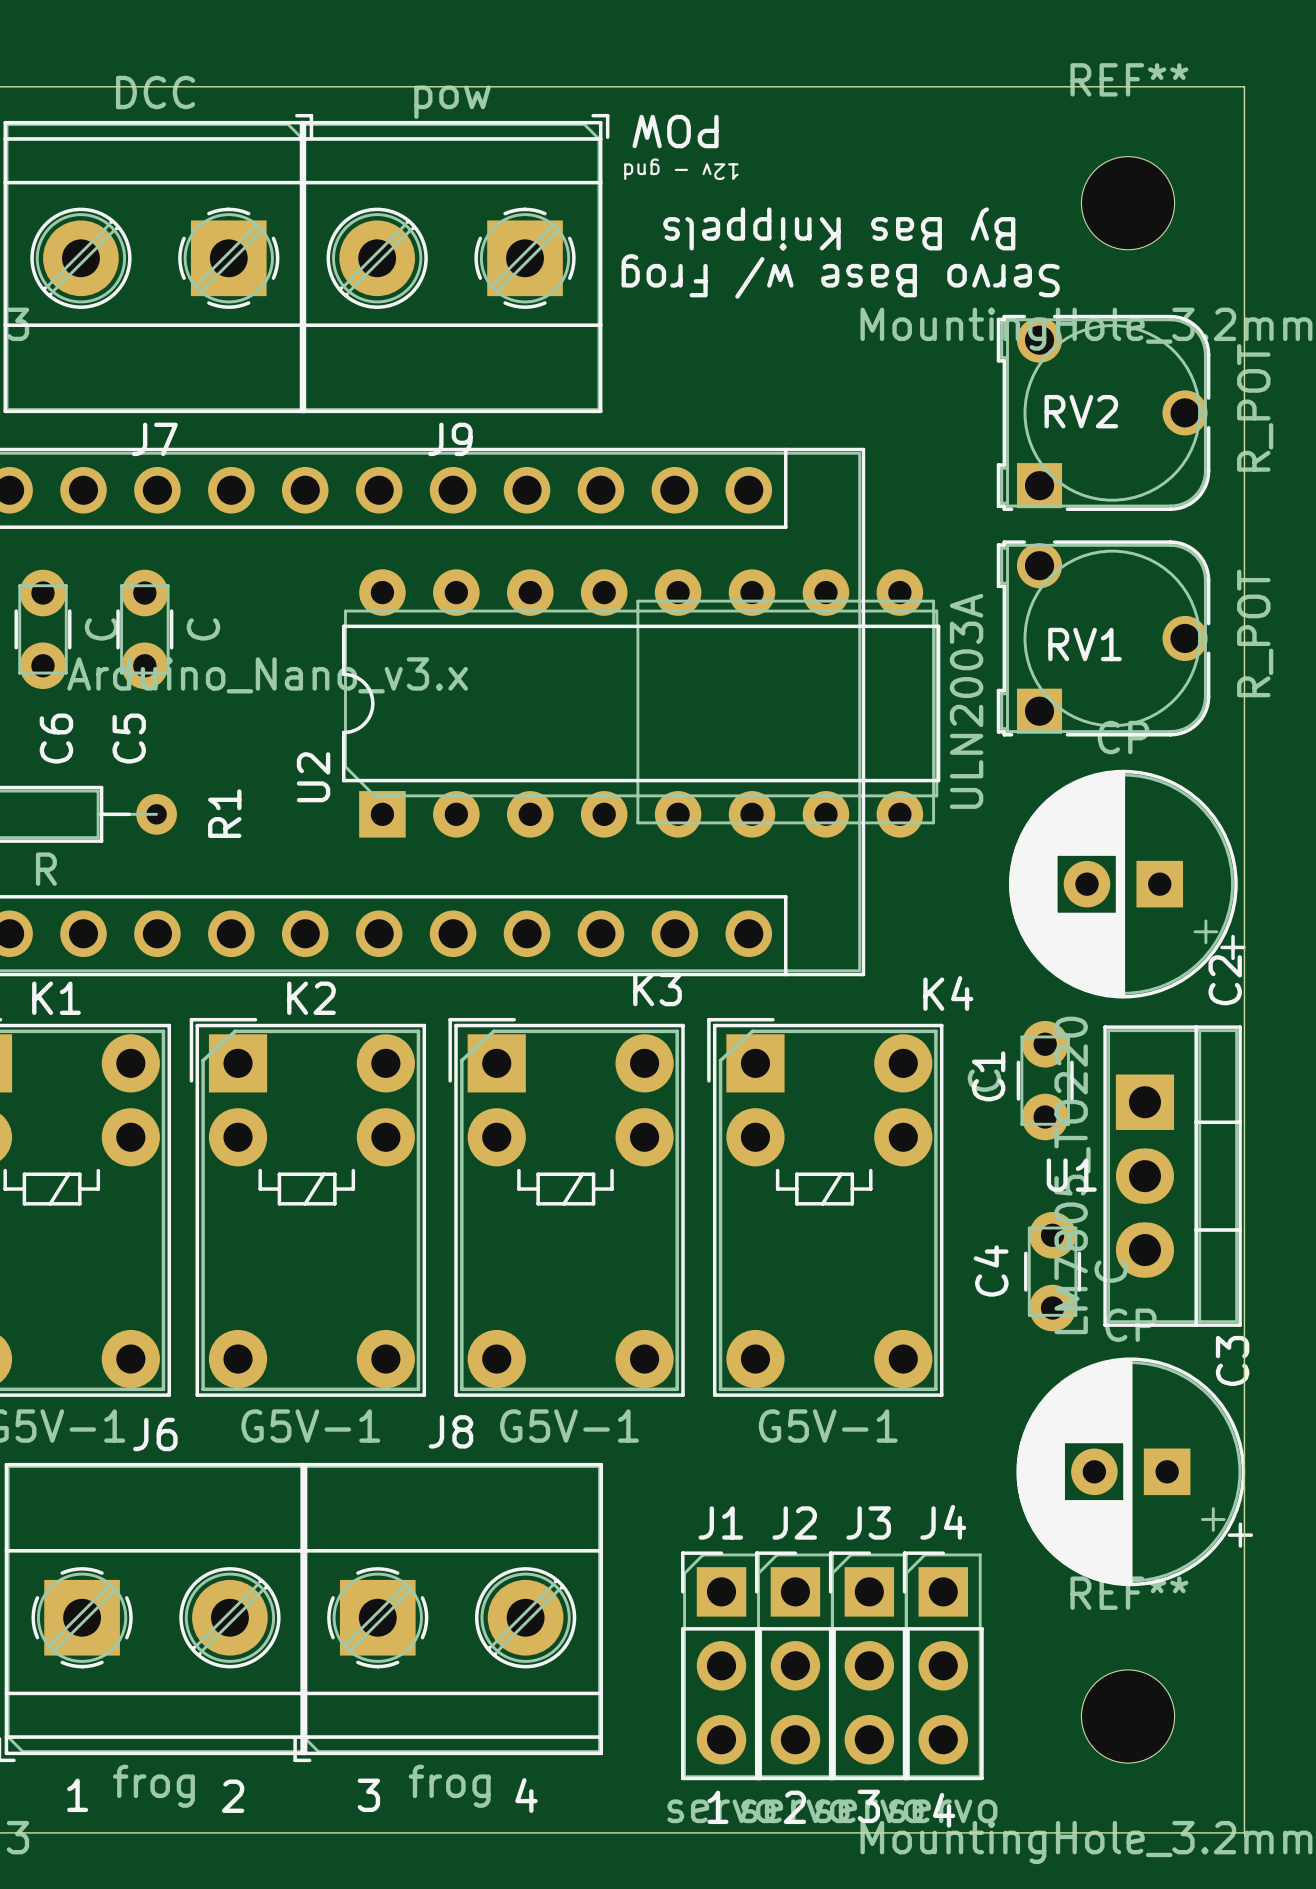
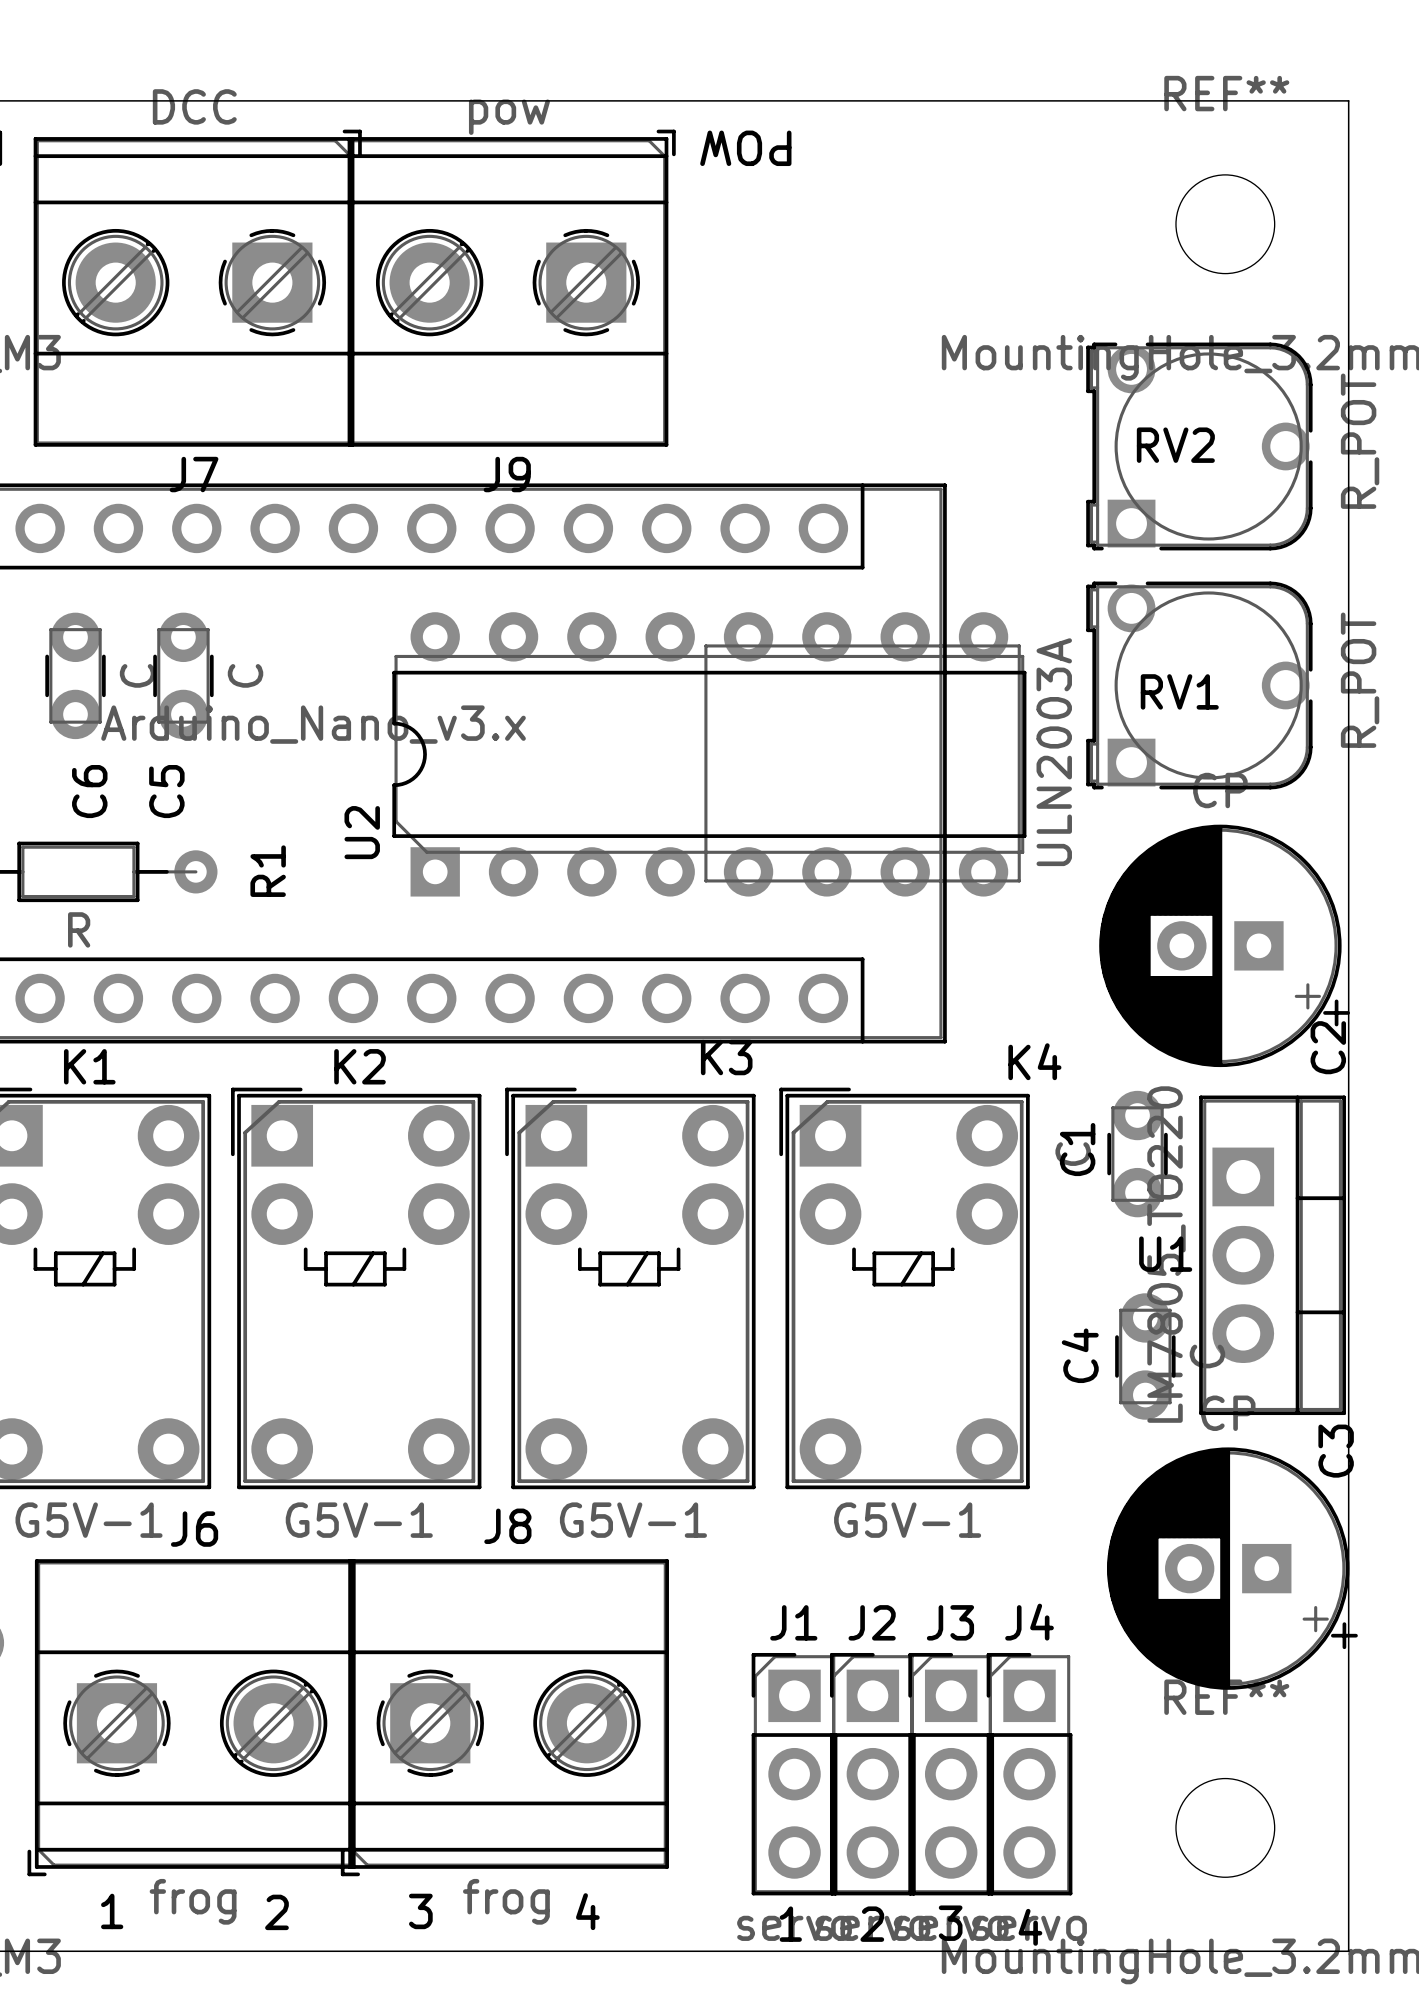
text: 12v - gnd (681, 169) -> none
text: By Bas Knippels (839, 228) -> none
text: Servo Base w/ Frog (840, 276) -> none

